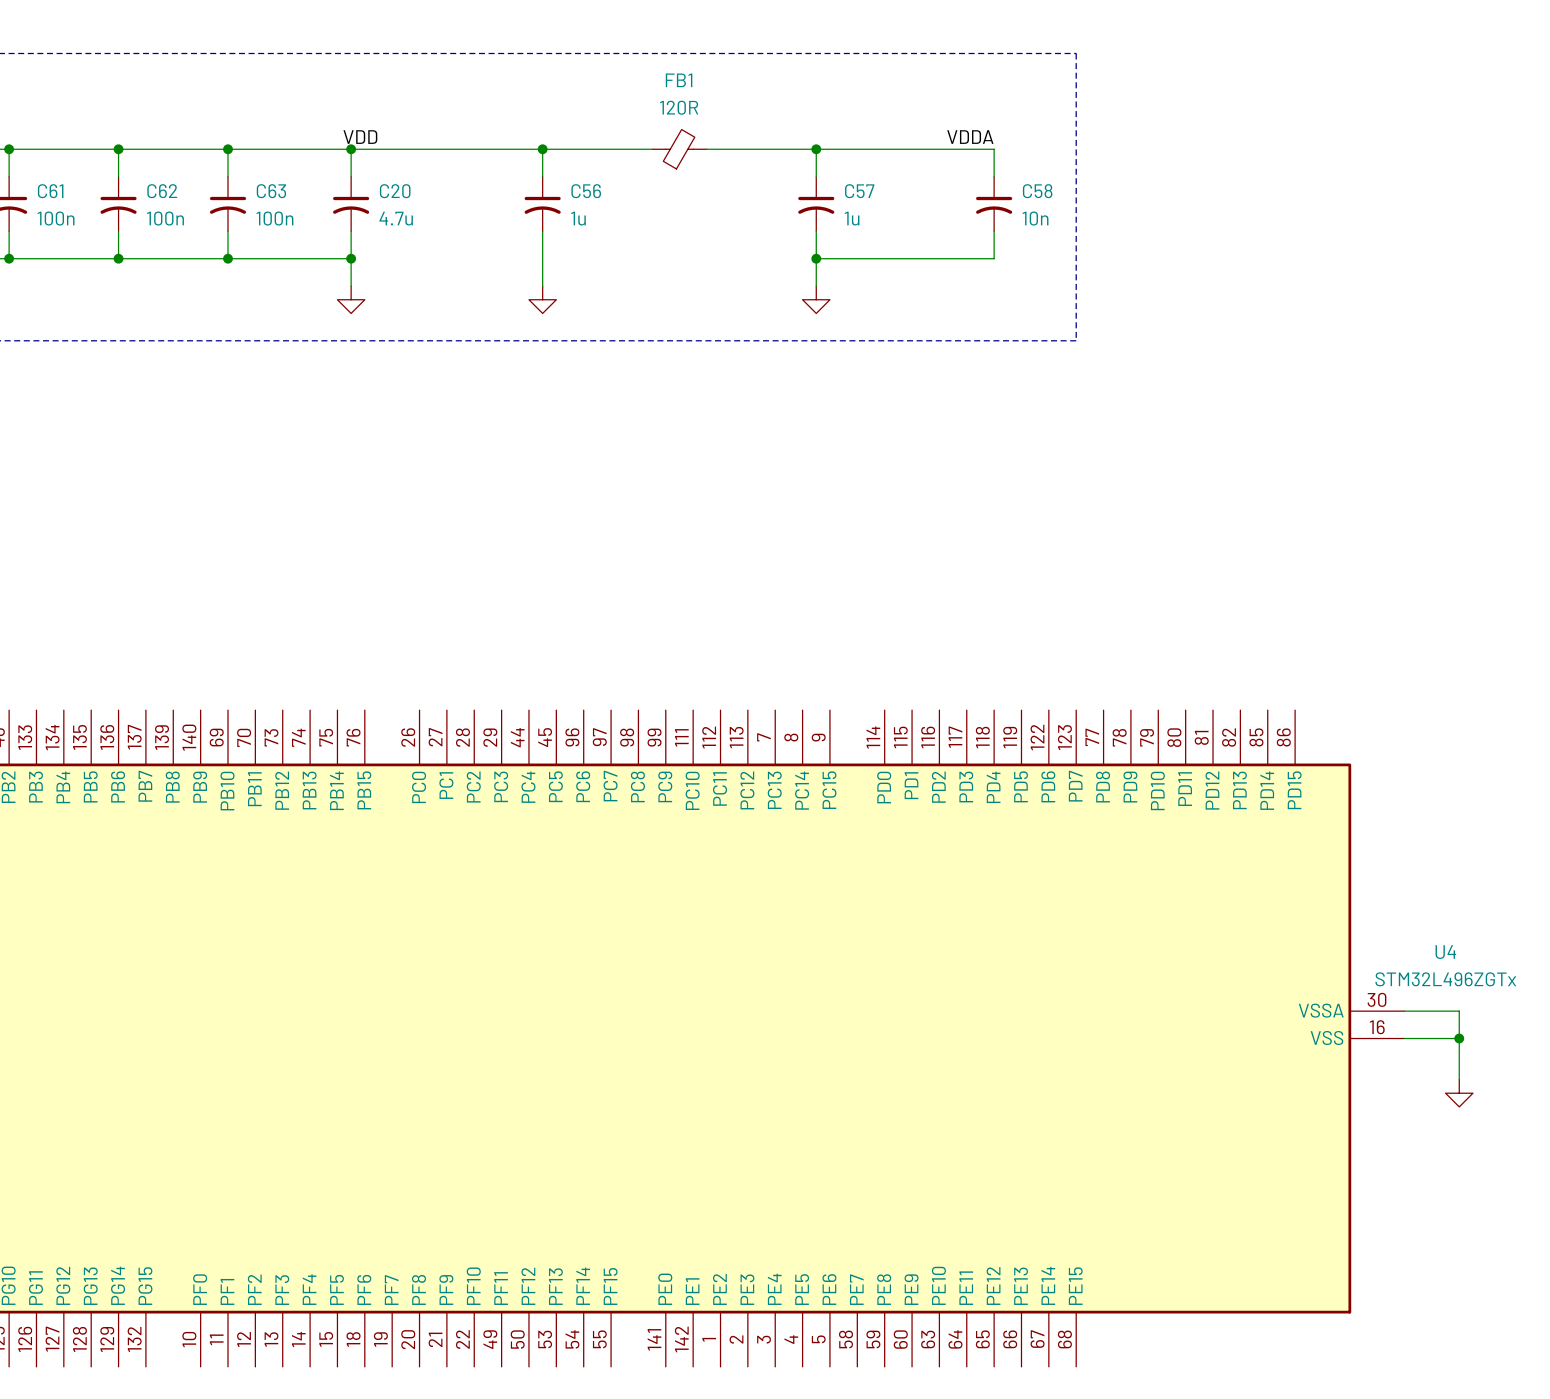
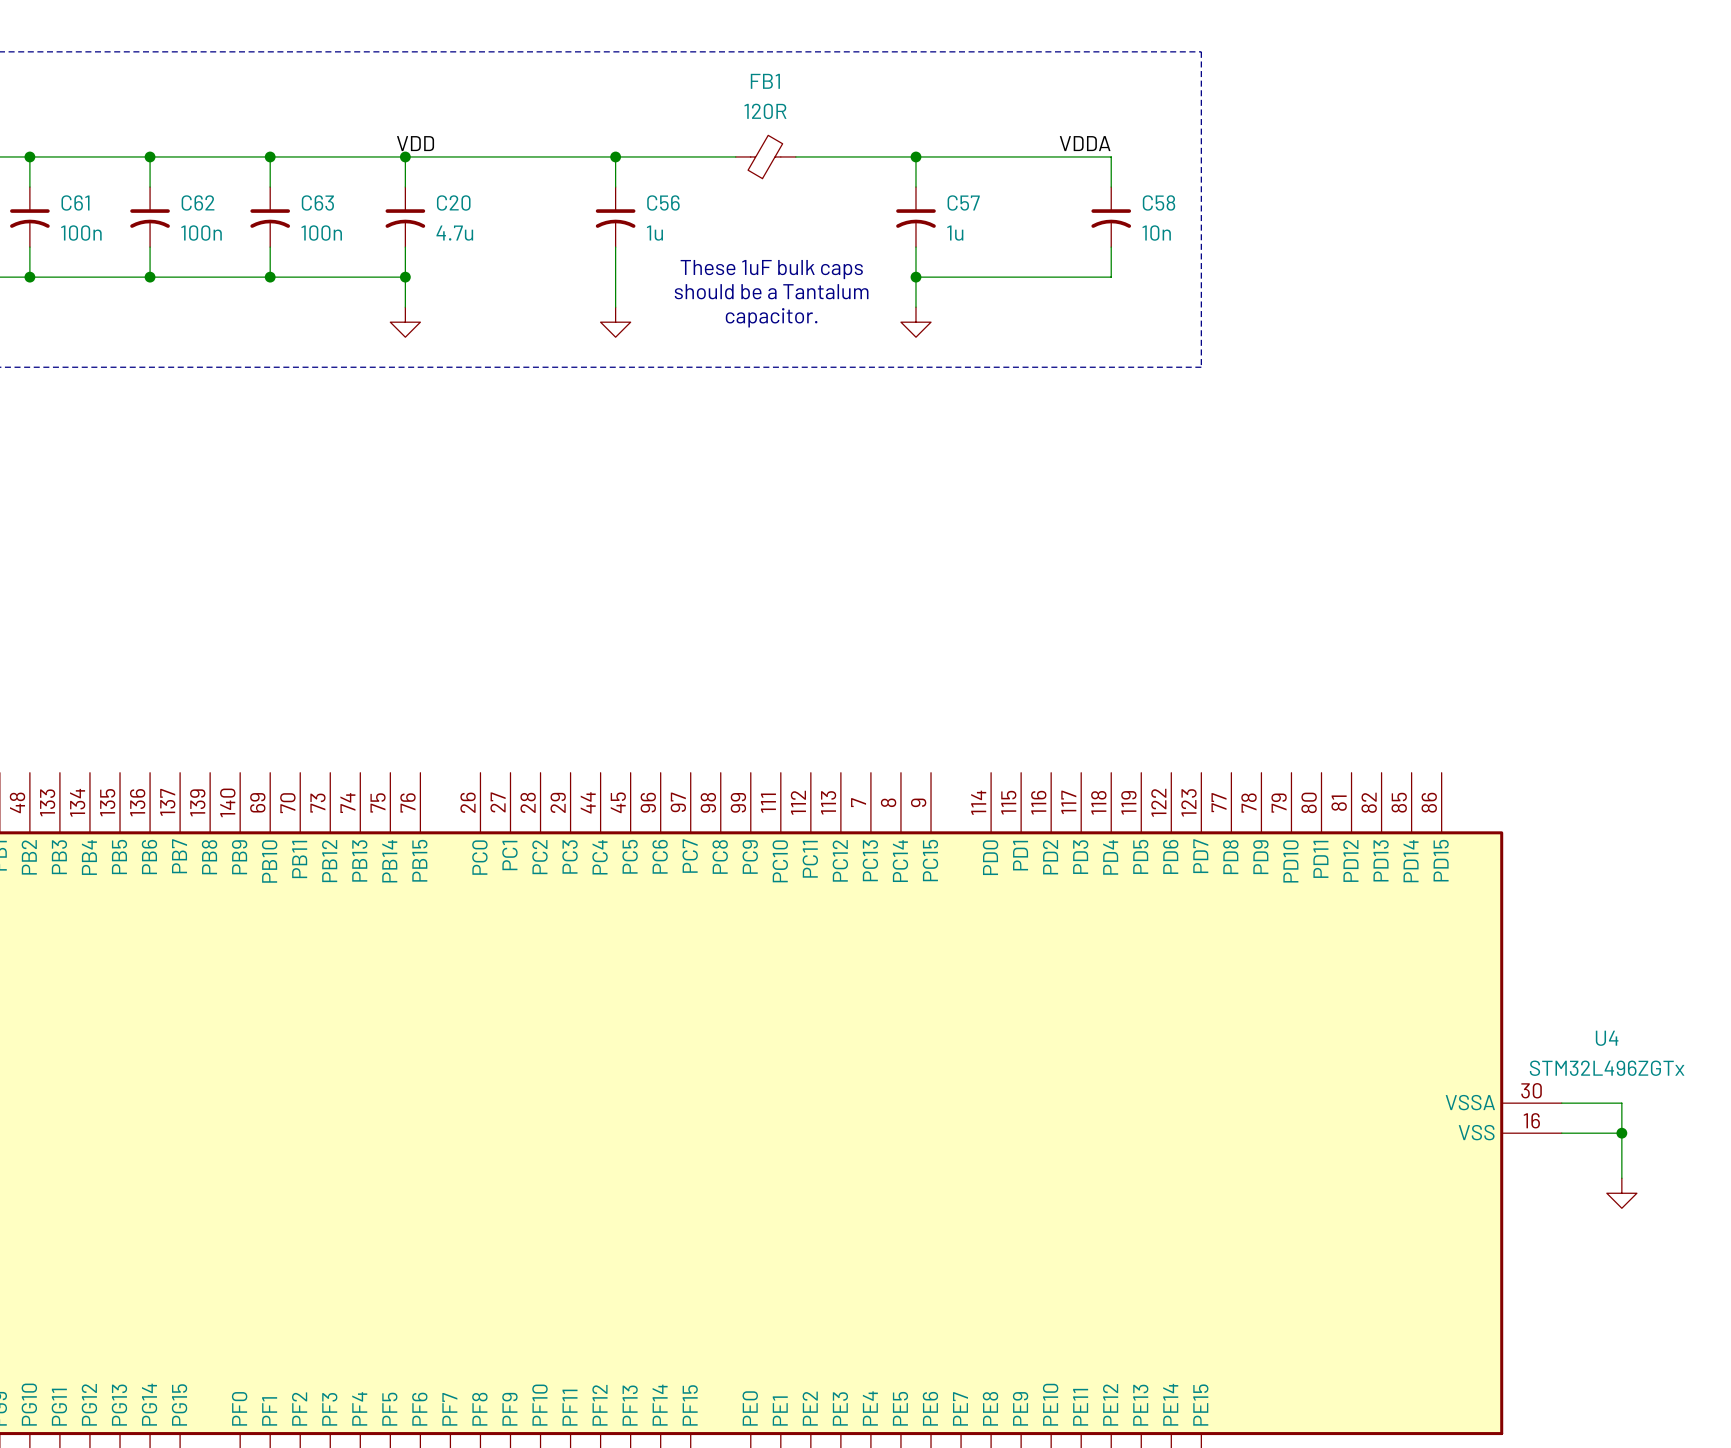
text: none -> These 1uF bulk caps (771, 269)
text: none -> should be a Tantalum (771, 291)
text: none -> capacitor. (771, 317)

